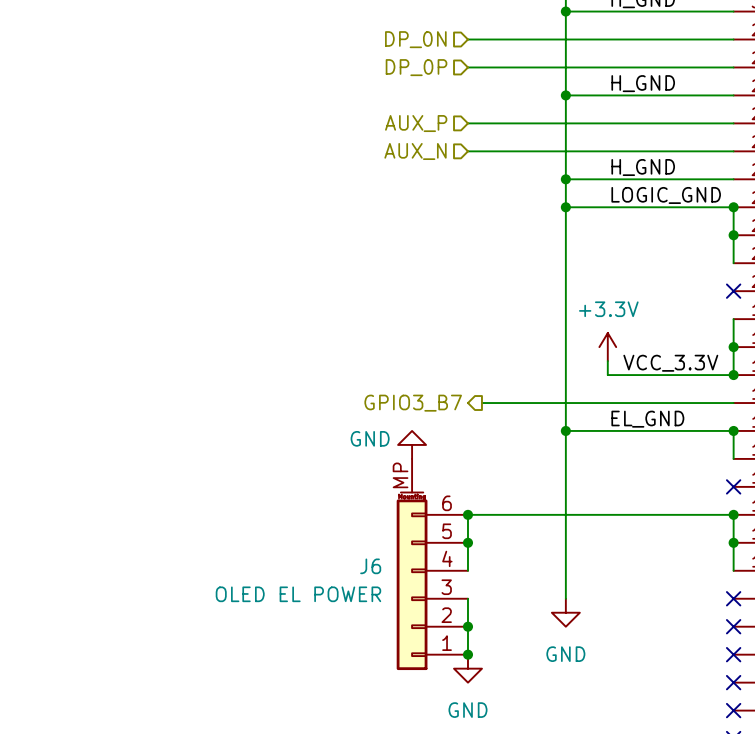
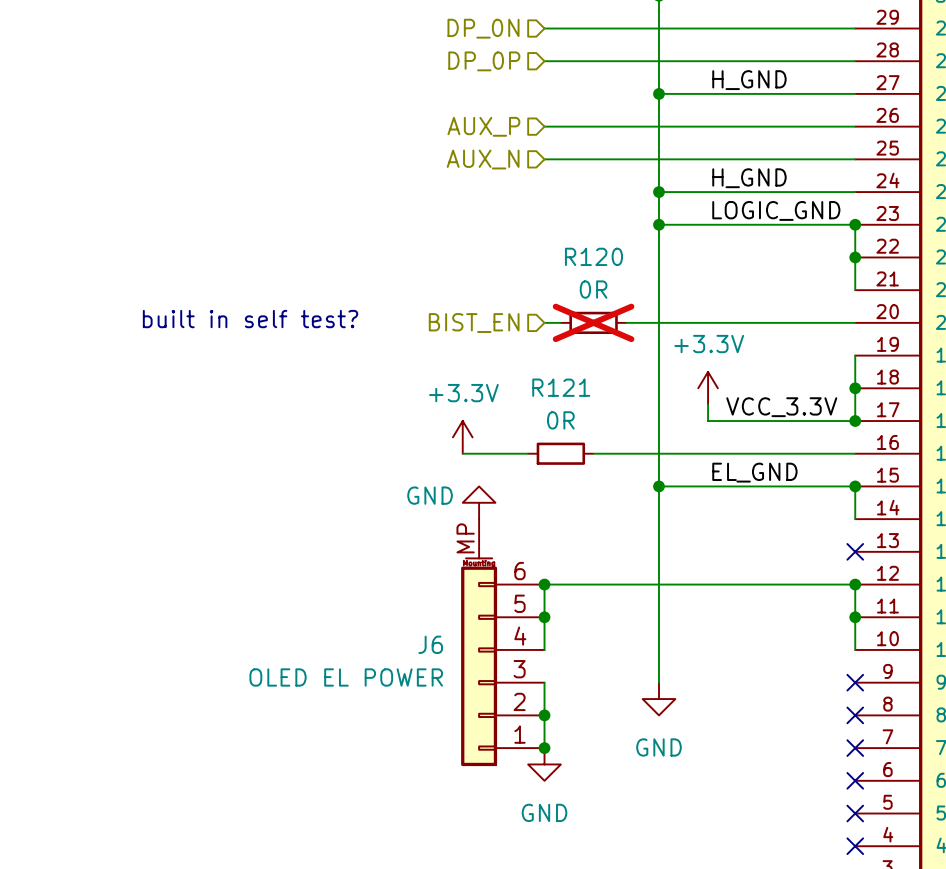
text: none -> built in self test? (250, 319)
hierarchical label: none -> BIST_EN (474, 323)
wire: none -> (544, 322) (560, 322)
R120: none -> 0R (593, 322)
wire: none -> (626, 322) (855, 322)
no-connect mark: (733, 291) -> none
power symbol: none -> +3.3V (462, 437)
wire: none -> (462, 453) (528, 453)
hierarchical label: GPIO3_B7 (413, 403) -> none
wire: (481, 403) (509, 403) -> none
R121: none -> 0R (560, 453)

